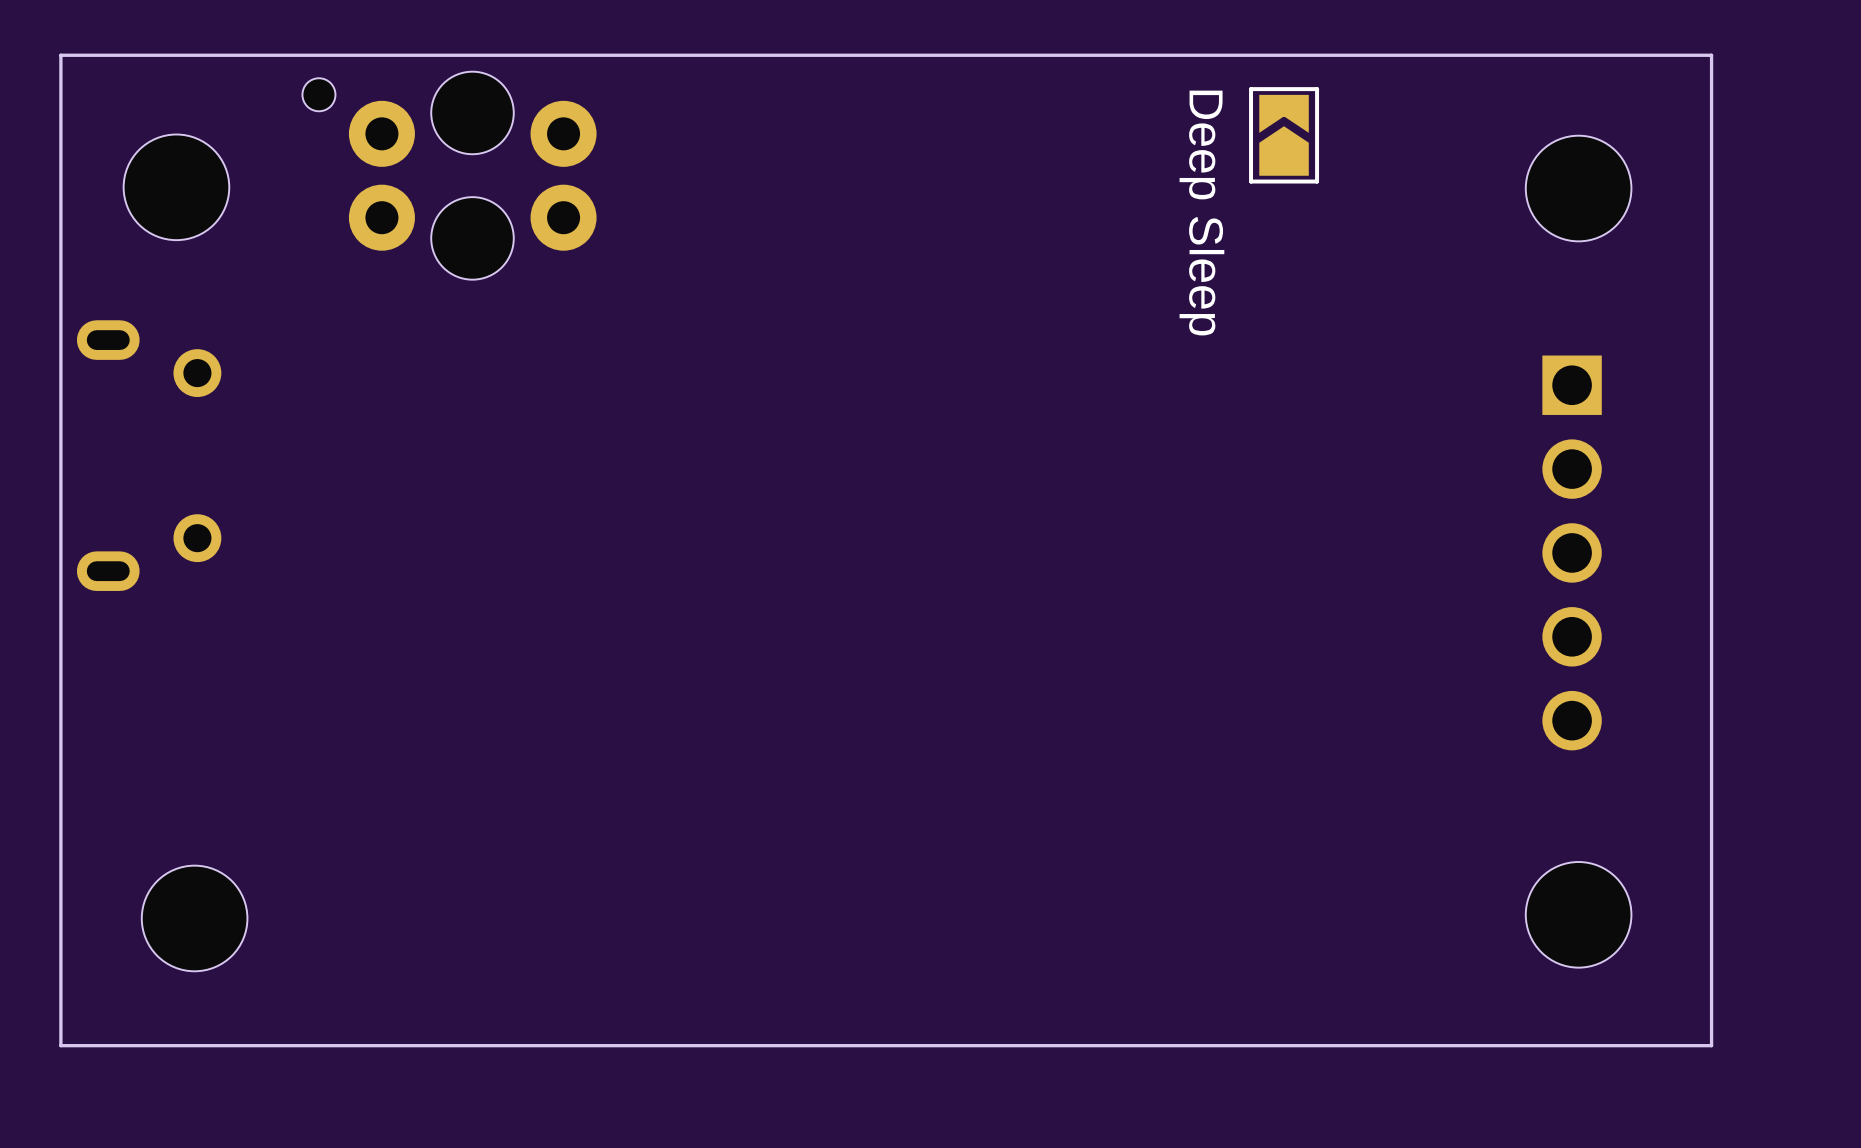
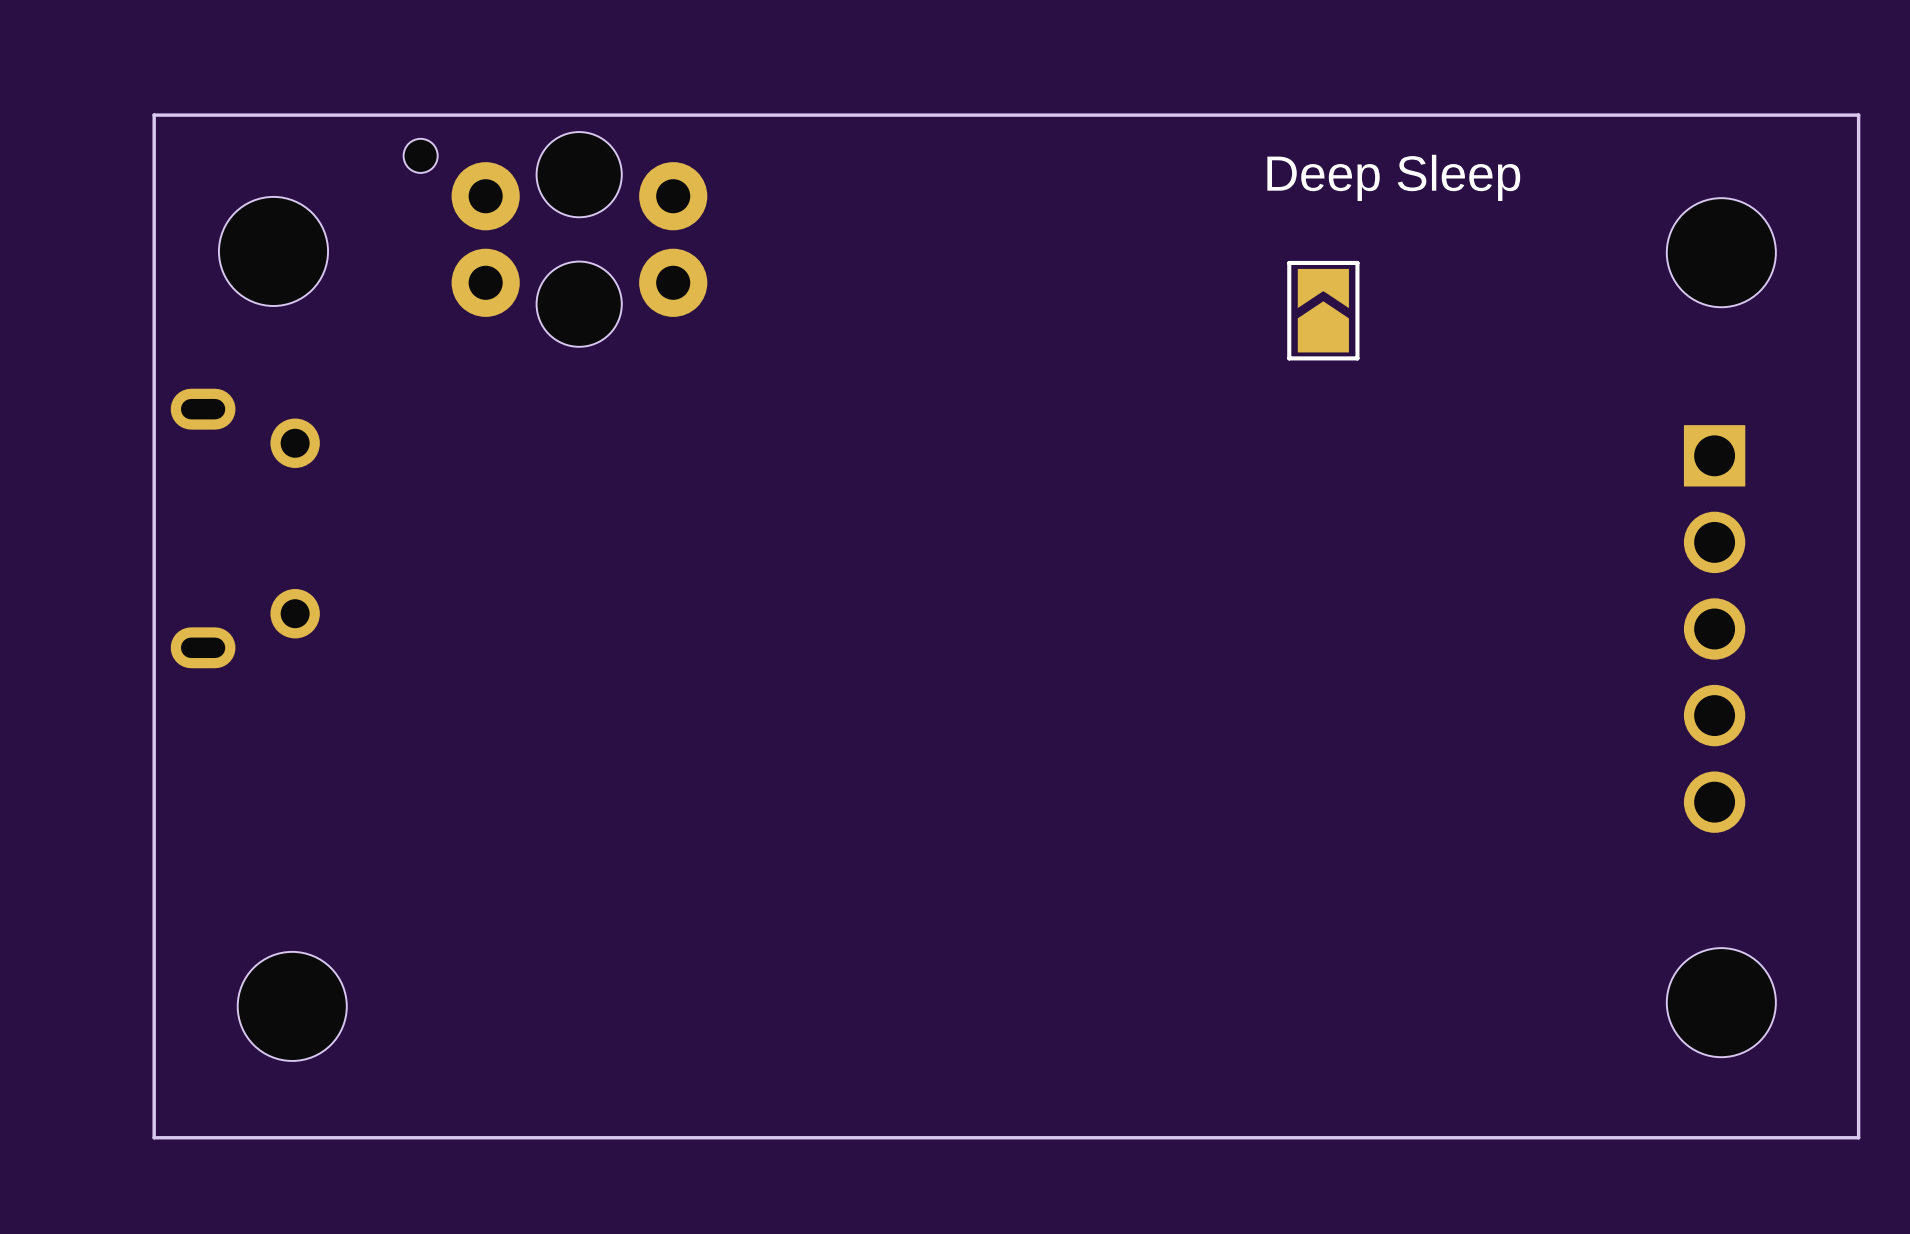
part position: (1284, 135) -> (1323, 310)
part value rotation: 0° (1201, 213) -> 90° counterclockwise (1393, 177)

